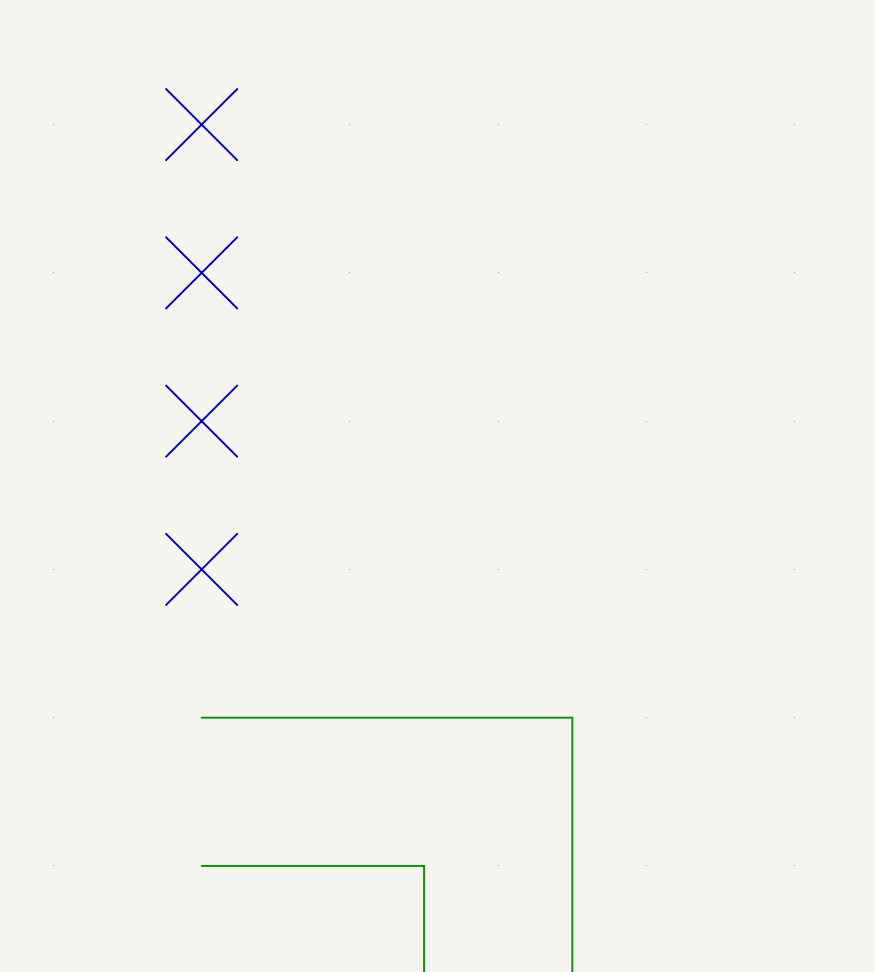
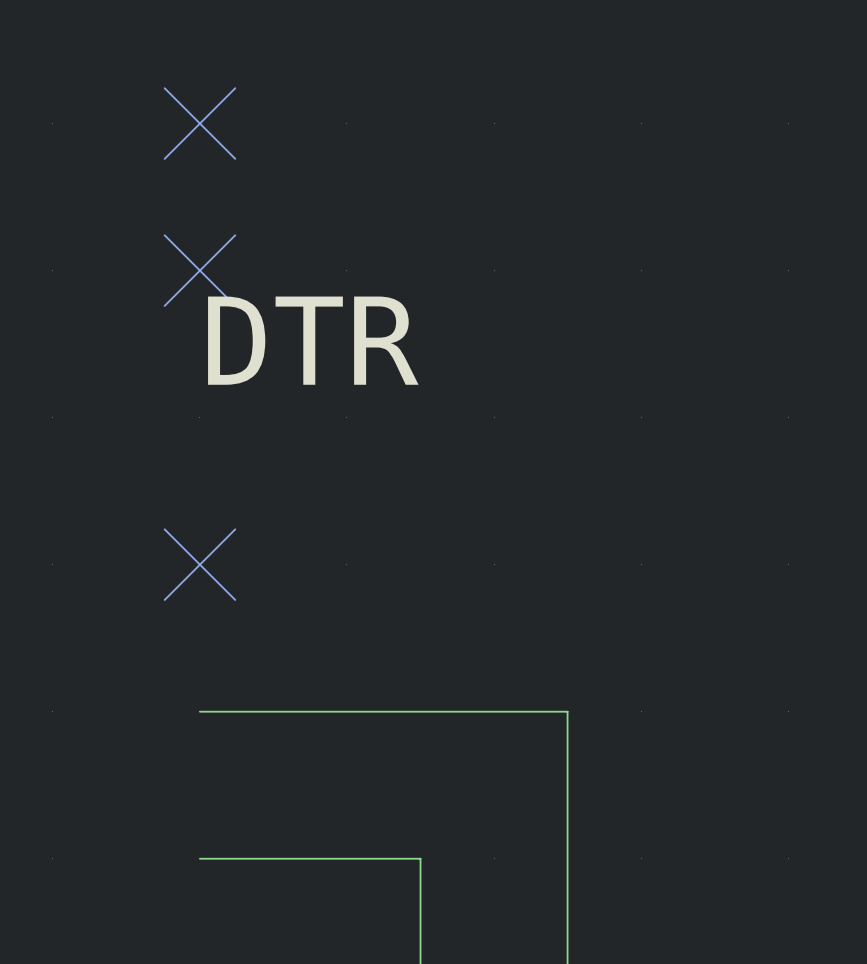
label: none -> DTR (313, 340)
no-connect mark: (201, 421) -> none

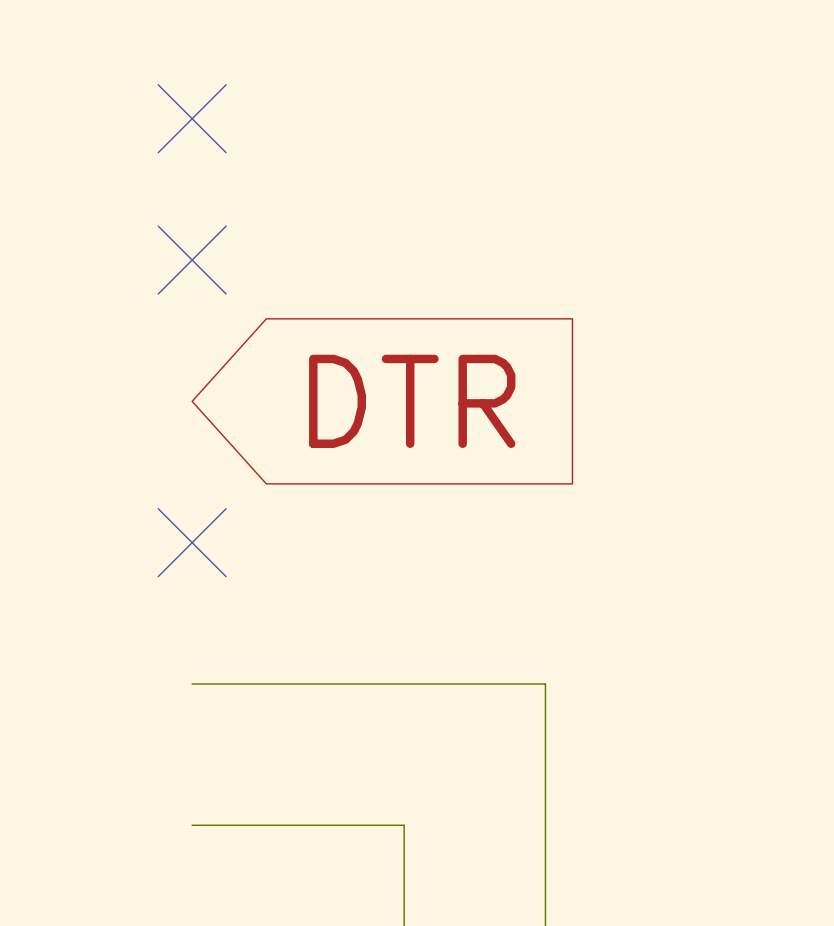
label: DTR (313, 340) -> none
global label: none -> DTR (412, 401)

